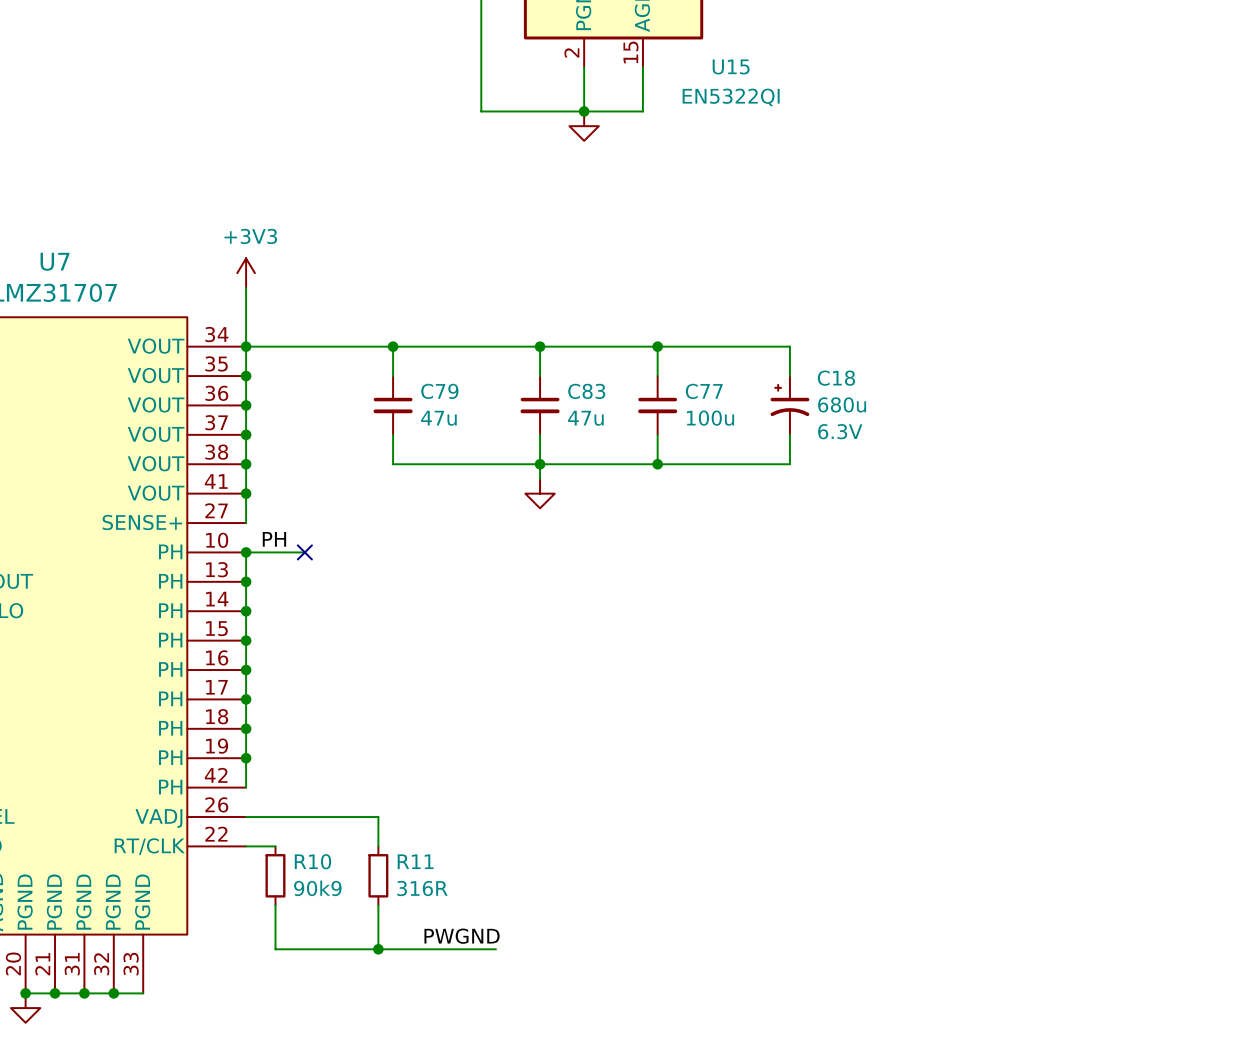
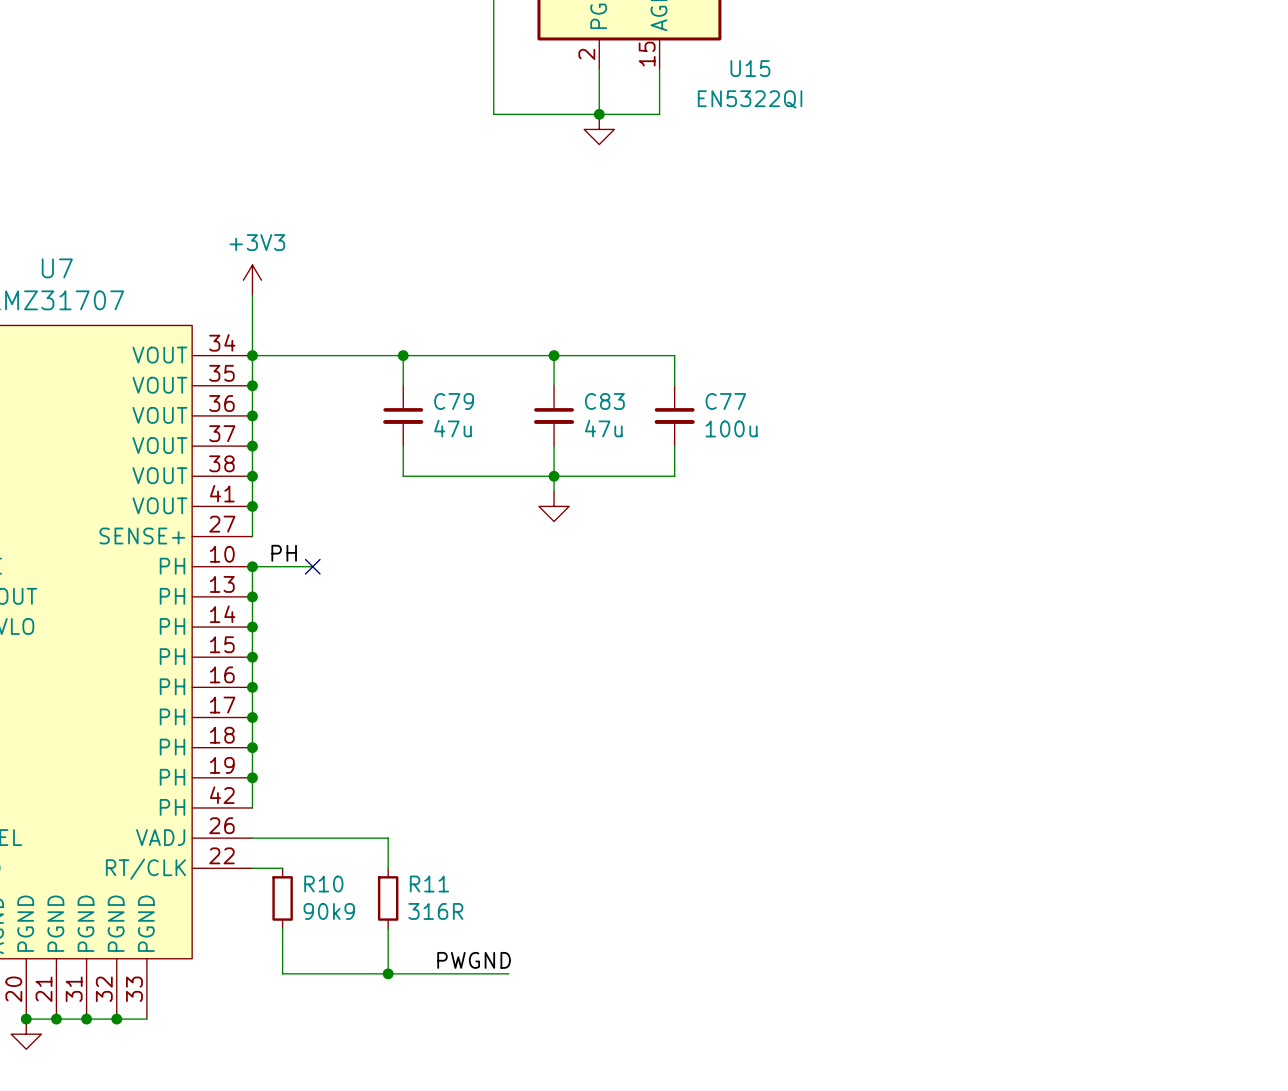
wire: (657, 346) (789, 346) (789, 376) -> none
junction: (657, 346) -> none
C18: 680u (789, 405) -> none
wire: (789, 434) (789, 464) (657, 464) -> none
junction: (657, 464) -> none

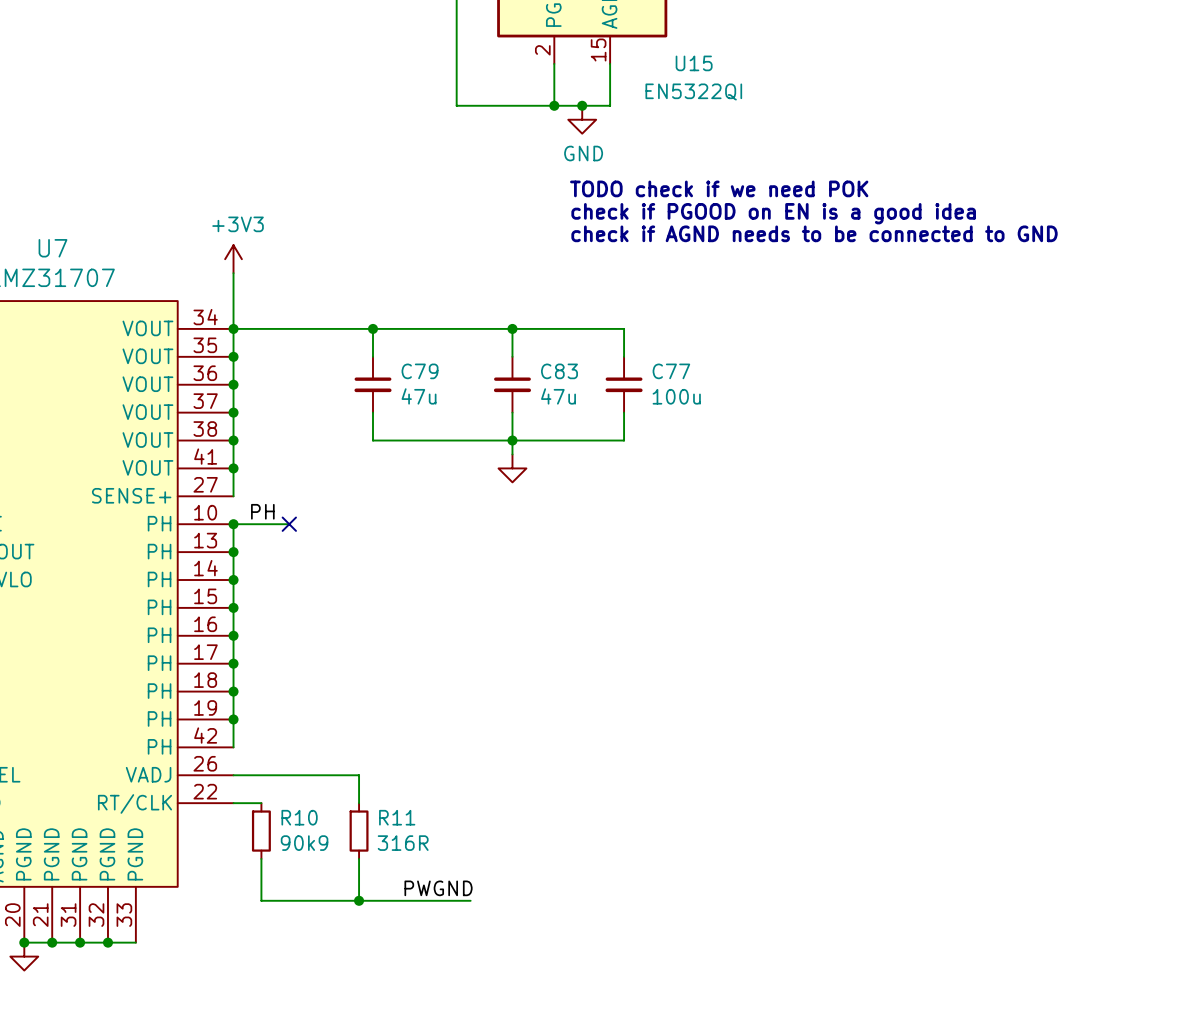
junction: none -> (582, 105)
power symbol: (599, 129) -> none
power symbol: none -> GND (582, 119)
text: none -> TODO check if we need POK (719, 188)
text: none -> check if PGOOD on EN is a good idea (773, 213)
text: none -> check if AGND needs to be connected to GND (814, 233)

